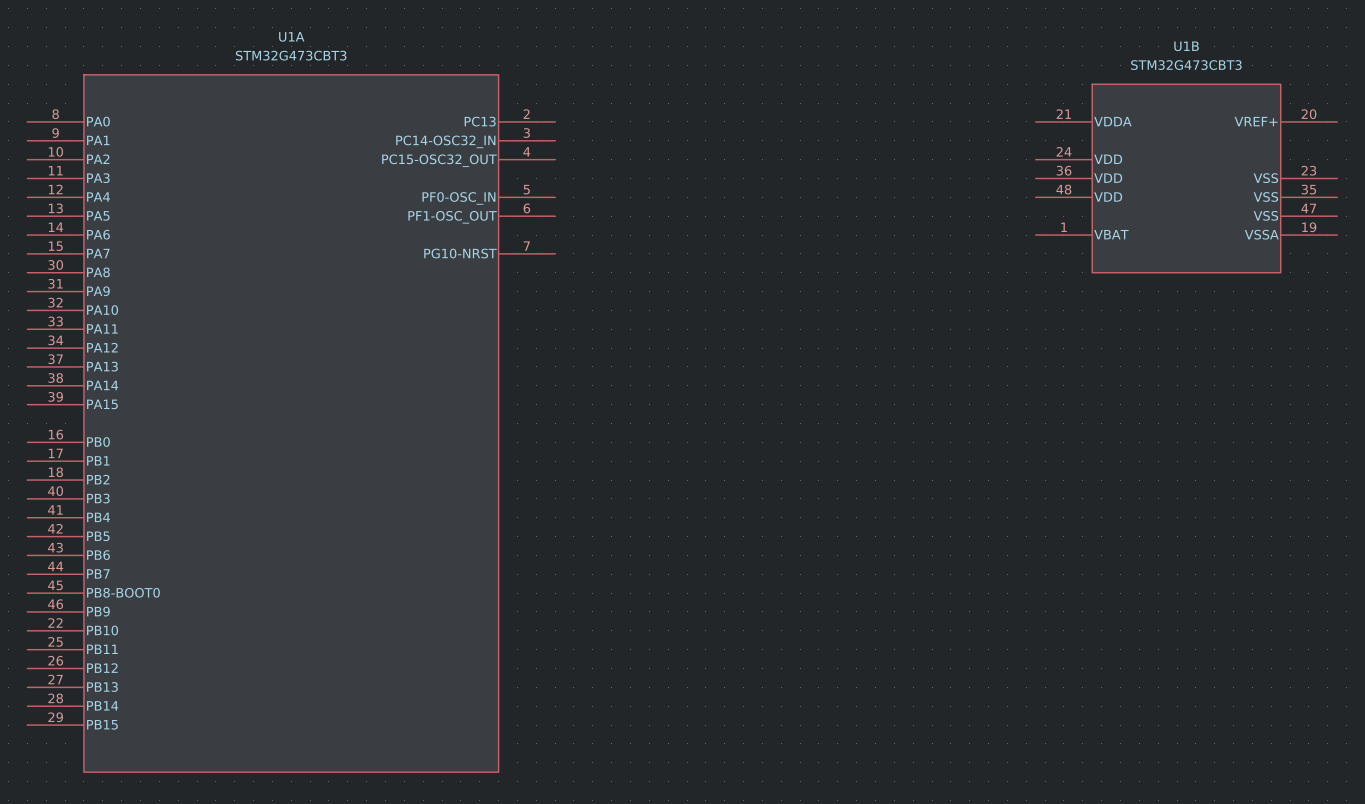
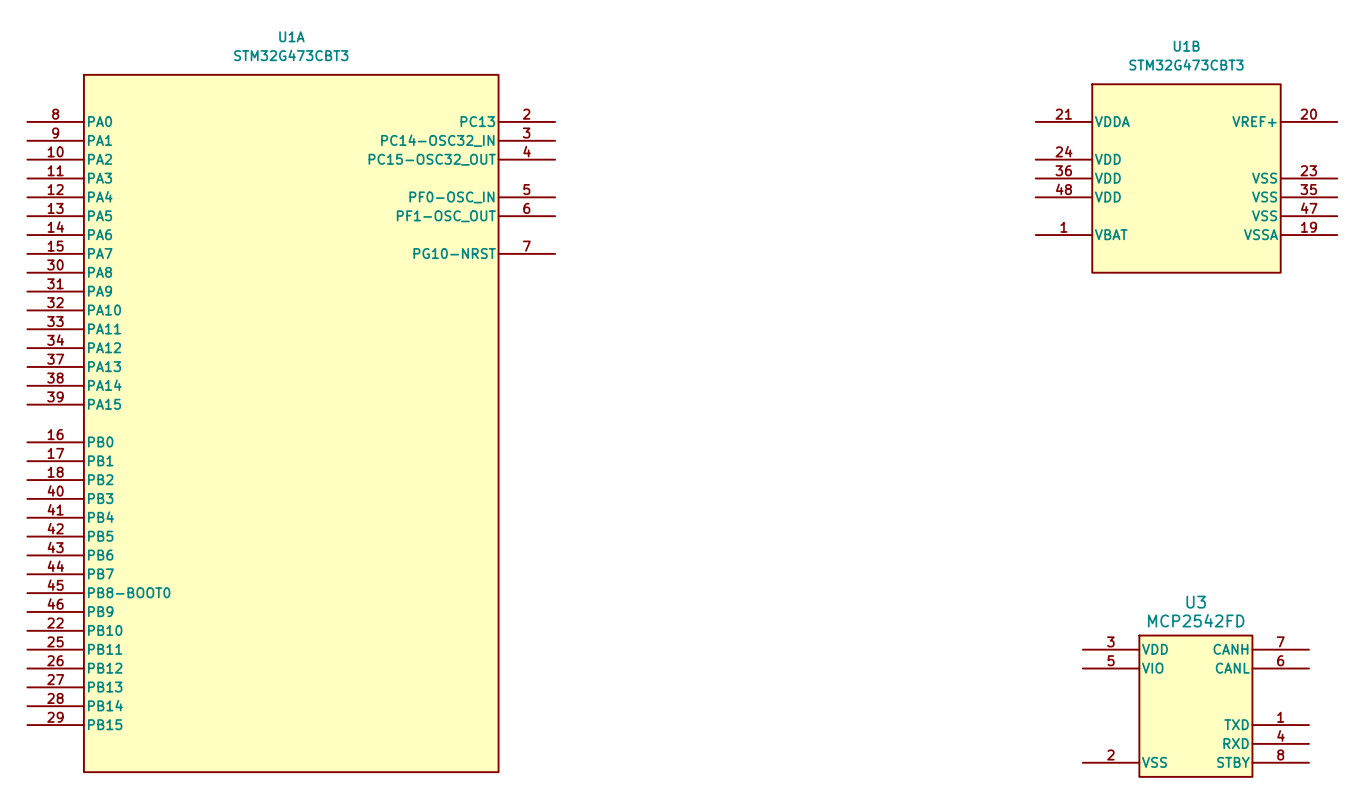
U3: none -> MCP2542FD (1195, 706)

